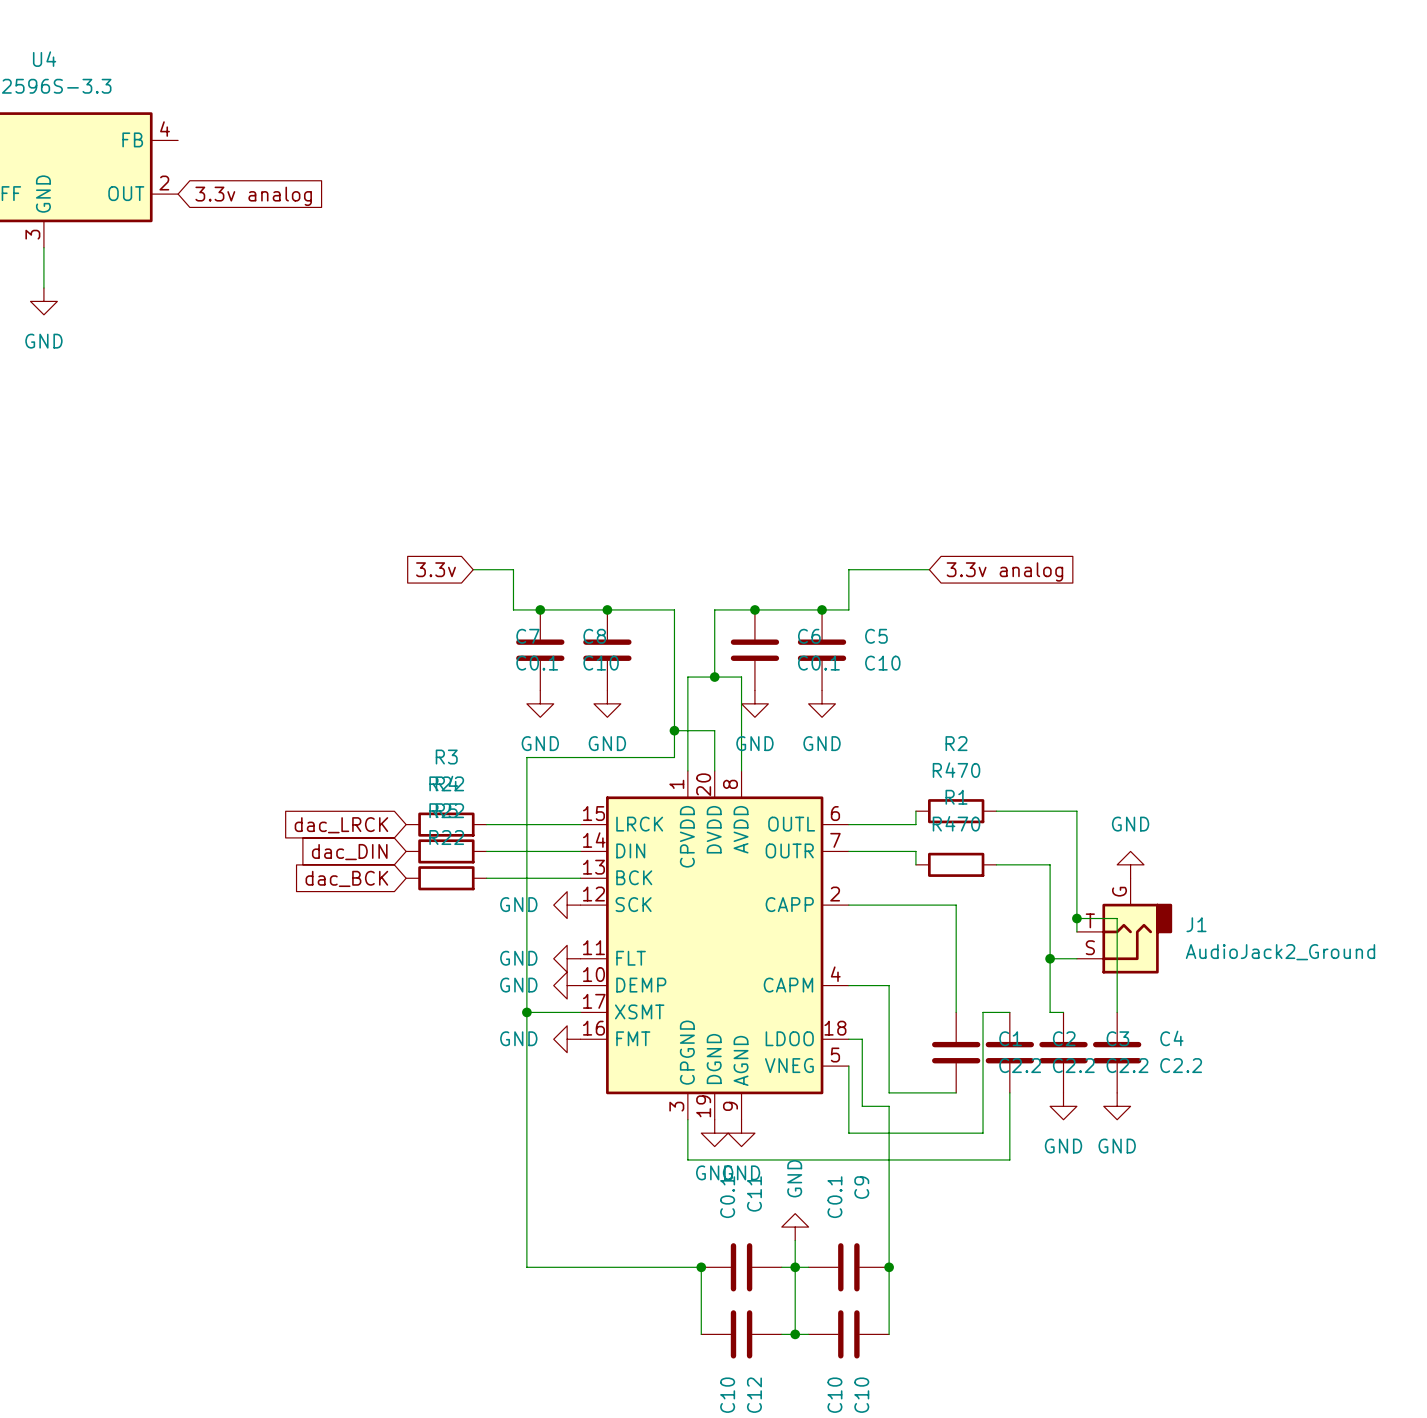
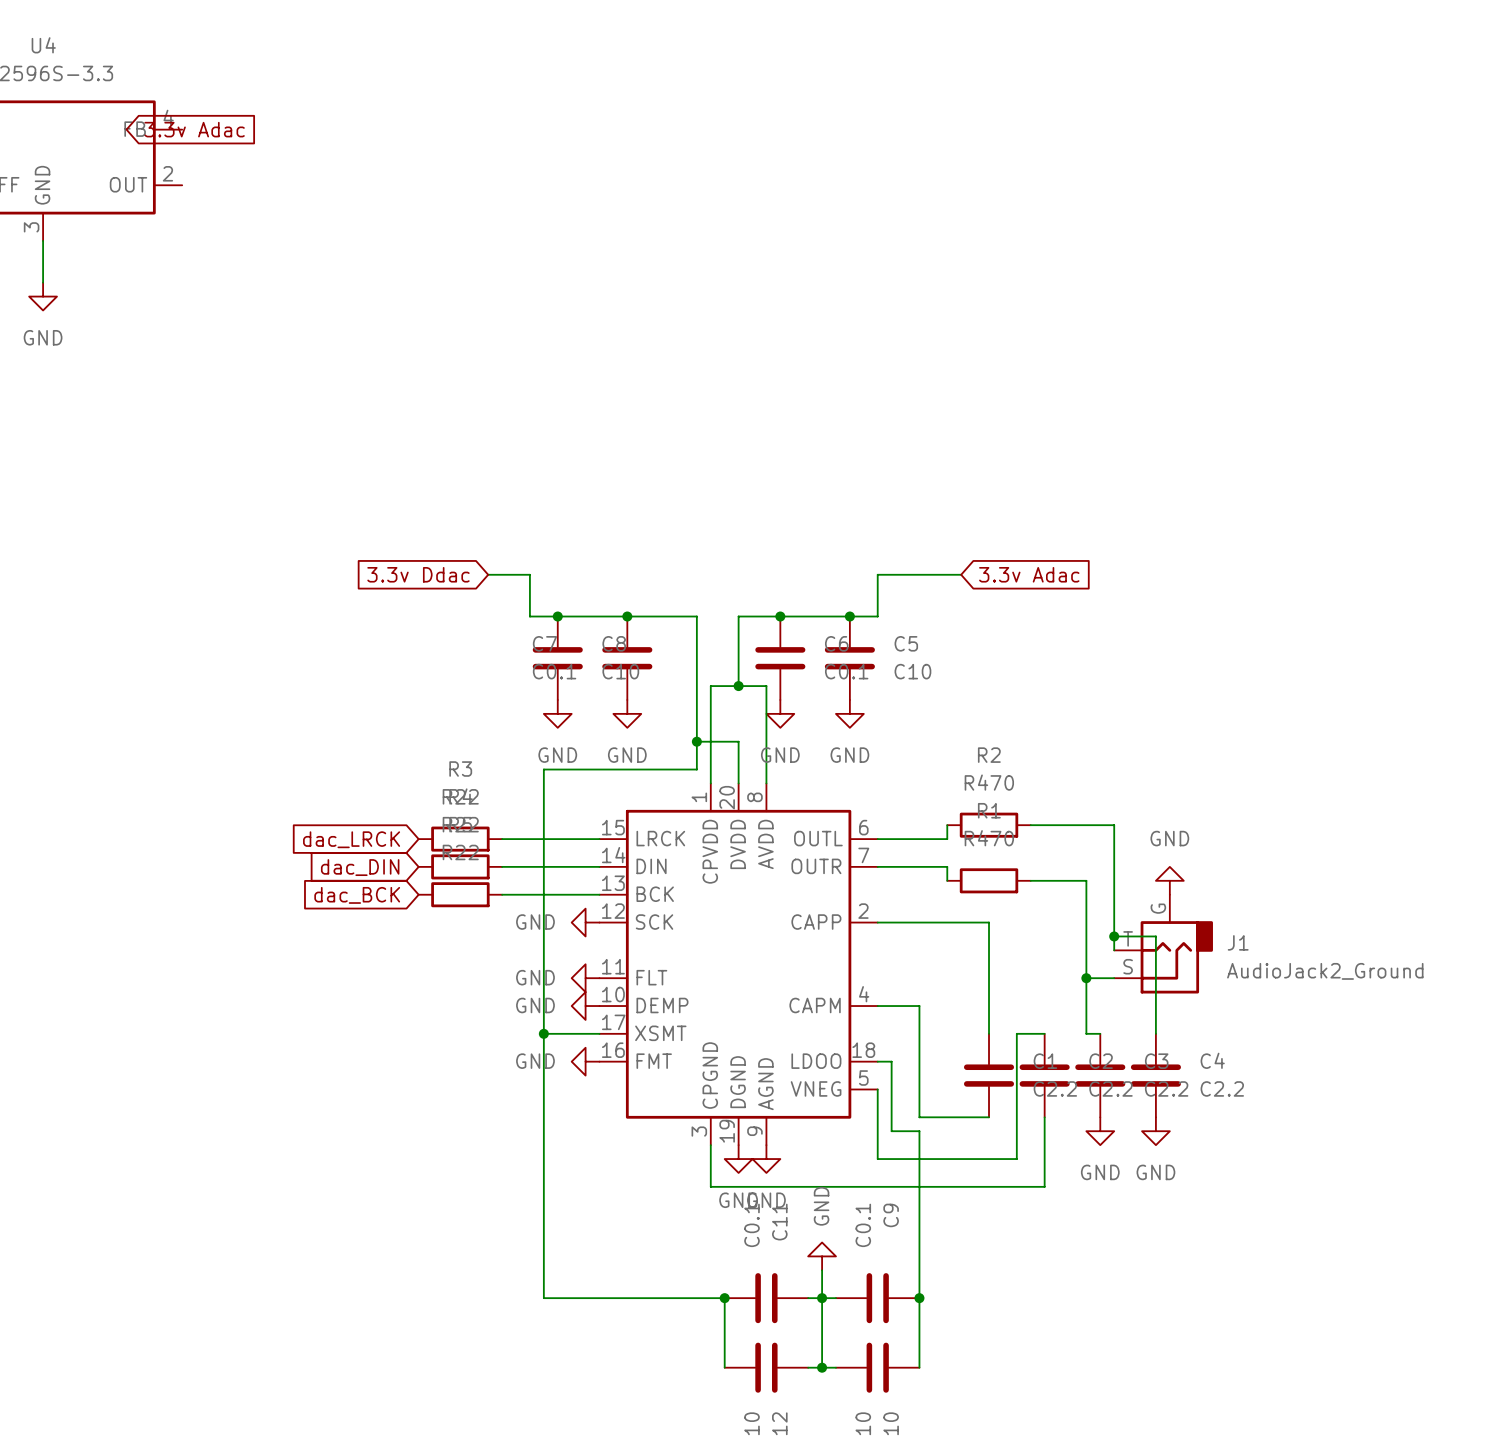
global label: none -> 3.3v Adac (194, 129)
global label: 3.3v analog (253, 196) -> none
global label: 3.3v (436, 569) -> 3.3v Ddac (418, 574)
global label: 3.3v analog (1004, 571) -> 3.3v Adac (1029, 574)

